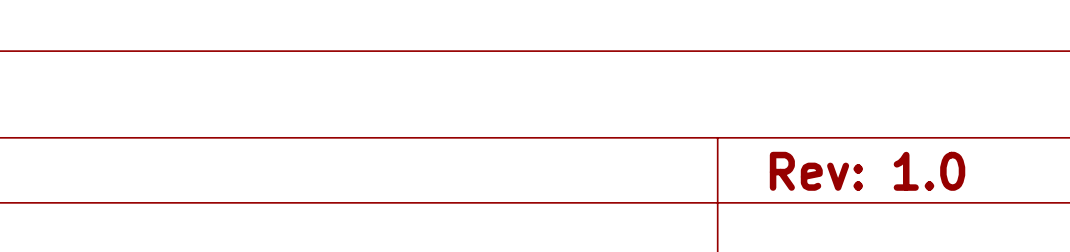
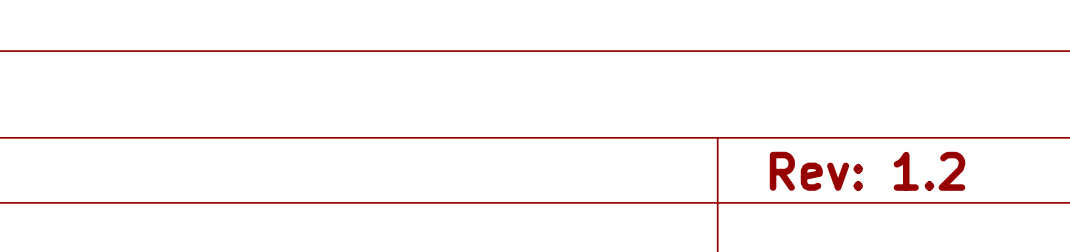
title block: Rev: 1.0 (867, 171) -> Rev: 1.2 (867, 171)

